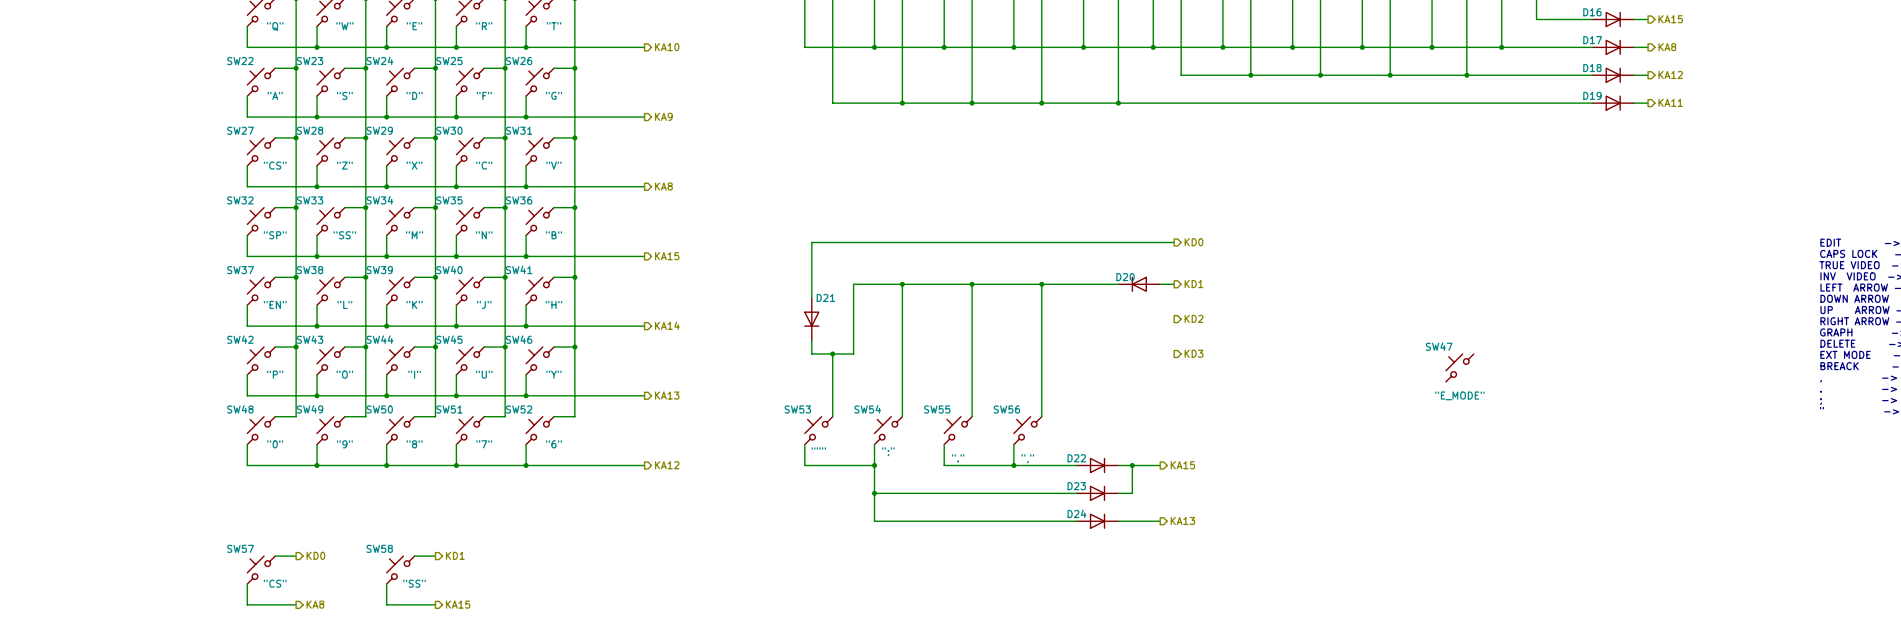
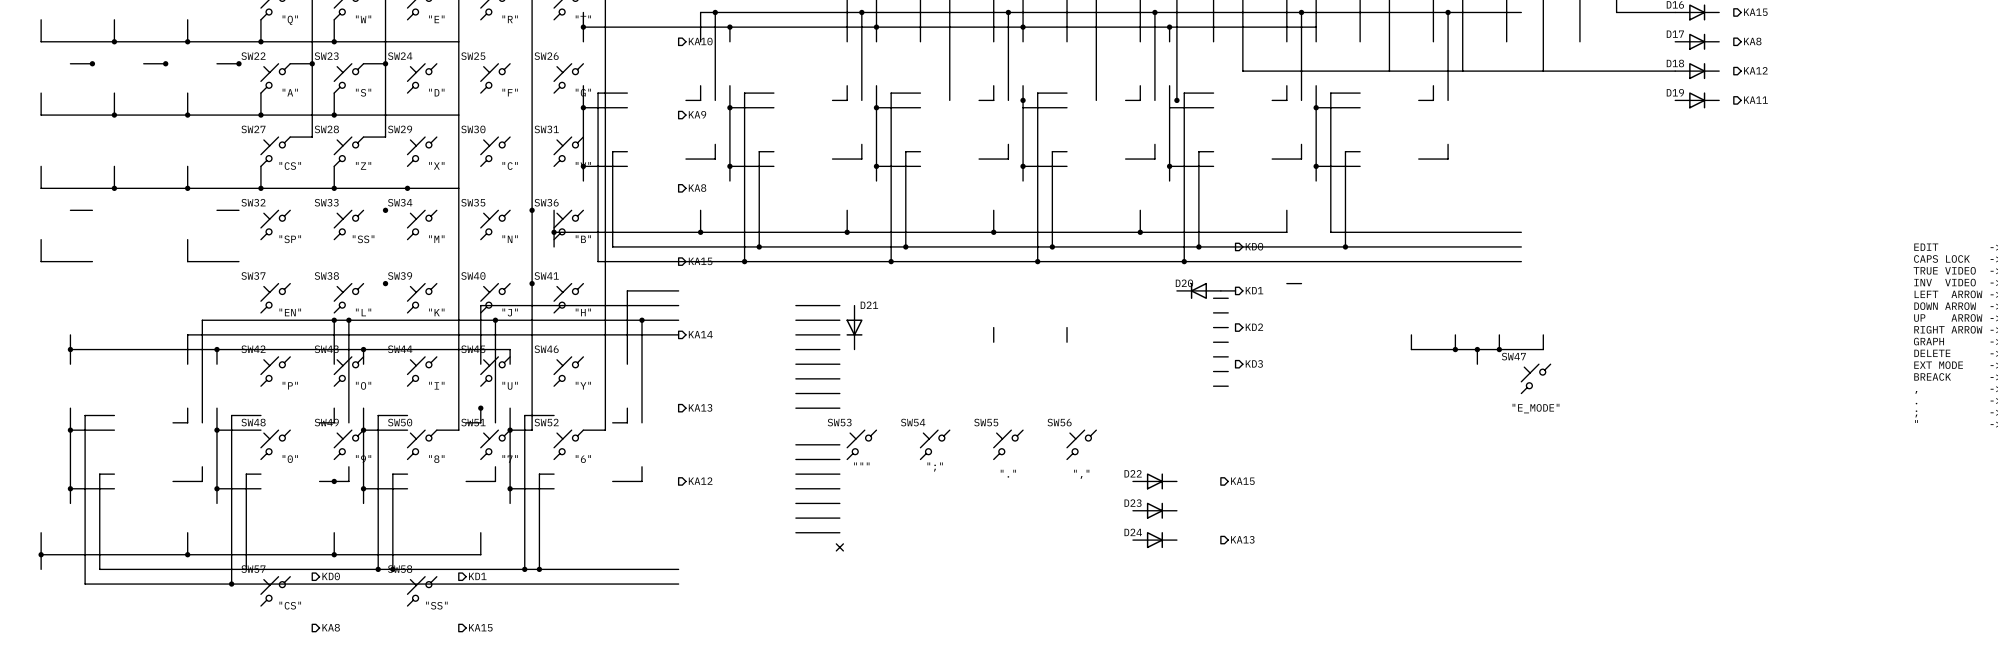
wire: none -> (583, 12) (583, 41)
wire: none -> (715, 12) (715, 100)
junction: none -> (715, 12)
wire: none -> (861, 12) (861, 100)
junction: none -> (861, 12)
wire: none -> (1008, 12) (1008, 100)
junction: none -> (1008, 12)
wire: none -> (1154, 12) (1154, 100)
junction: none -> (1154, 12)
wire: none -> (1301, 12) (1301, 100)
junction: none -> (1301, 12)
wire: none -> (1448, 12) (1448, 100)
junction: none -> (1448, 12)
wire: none -> (1521, 12) (700, 12) (700, 41)
wire: (1634, 19) (1648, 19) -> none
wire: none -> (41, 19) (41, 41) (260, 41)
wire: none -> (114, 19) (114, 41)
wire: none -> (187, 19) (187, 41)
wire: (386, 26) (386, 47) -> none
wire: (456, 26) (456, 47) -> none
wire: (526, 26) (526, 47) -> none
wire: none -> (583, 27) (1316, 27)
junction: none -> (583, 27)
wire: none -> (729, 27) (729, 41)
junction: none -> (729, 27)
junction: none -> (876, 27)
junction: none -> (1023, 27)
wire: none -> (1169, 27) (1169, 41)
junction: none -> (1169, 27)
junction: none -> (114, 41)
junction: none -> (187, 41)
junction: none -> (260, 41)
junction: (386, 47) -> none
wire: (435, 47) (644, 47) -> none
junction: (456, 47) -> none
junction: (526, 47) -> none
wire: (804, 47) (1592, 47) -> none
wire: (832, 47) (832, 89) -> none
junction: (874, 47) -> none
junction: (944, 47) -> none
wire: (972, 47) (972, 89) -> none
junction: (1013, 47) -> none
junction: (1083, 47) -> none
junction: (1153, 47) -> none
junction: (1222, 47) -> none
wire: (1250, 47) (1250, 75) -> none
junction: (1292, 47) -> none
junction: (1362, 47) -> none
junction: (1432, 47) -> none
junction: (1501, 47) -> none
wire: (1634, 47) (1648, 47) -> none
wire: none -> (70, 63) (92, 63)
junction: none -> (92, 63)
wire: none -> (143, 63) (165, 63)
junction: none -> (165, 63)
wire: none -> (216, 63) (238, 63)
junction: none -> (238, 63)
wire: (414, 68) (435, 68) -> none
junction: (435, 68) -> none
wire: (484, 68) (505, 68) -> none
junction: (505, 68) -> none
wire: (553, 68) (574, 68) -> none
junction: (574, 68) -> none
junction: (1250, 75) -> none
junction: (1320, 75) -> none
junction: (1390, 75) -> none
junction: (1466, 75) -> none
wire: (1634, 75) (1648, 75) -> none
wire: none -> (583, 85) (583, 181)
wire: none -> (700, 85) (700, 100) (685, 100)
wire: none -> (729, 85) (729, 181)
wire: none -> (847, 85) (847, 100) (832, 100)
wire: none -> (1169, 85) (1169, 181)
wire: none -> (1316, 85) (1316, 181)
wire: none -> (41, 93) (41, 115) (260, 115)
wire: none -> (114, 93) (114, 115)
wire: none -> (187, 93) (187, 115)
wire: (386, 96) (386, 117) -> none
wire: (456, 96) (456, 117) -> none
wire: (526, 96) (526, 117) -> none
wire: none -> (773, 93) (744, 93) (744, 261)
wire: none -> (920, 93) (891, 93) (891, 261)
wire: none -> (1067, 93) (1037, 93) (1037, 261)
wire: none -> (1213, 93) (1184, 93) (1184, 261)
wire: none -> (1360, 93) (1330, 93) (1330, 232) (1521, 232)
wire: (832, 103) (930, 103) -> (876, 100) (876, 181)
junction: (902, 103) -> none
wire: (944, 103) (1069, 103) -> (993, 100) (993, 85)
wire: none -> (1023, 100) (1023, 181)
junction: (1041, 103) -> none
wire: (1083, 103) (1209, 103) -> (1140, 100) (1140, 85)
wire: (1222, 103) (1348, 103) -> (1286, 100) (1286, 85)
wire: (1362, 103) (1592, 103) -> (1433, 100) (1433, 85)
wire: (1634, 103) (1648, 103) -> none
wire: none -> (583, 107) (627, 107)
junction: none -> (583, 107)
wire: none -> (729, 107) (773, 107)
junction: none -> (729, 107)
wire: none -> (876, 107) (920, 107)
junction: none -> (876, 107)
wire: none -> (1023, 107) (1067, 107)
wire: none -> (1169, 107) (1213, 107)
wire: none -> (1316, 107) (1360, 107)
junction: none -> (1316, 107)
junction: none -> (114, 115)
junction: none -> (187, 115)
junction: none -> (260, 115)
junction: (386, 117) -> none
wire: (435, 117) (644, 117) -> none
junction: (456, 117) -> none
junction: (526, 117) -> none
wire: (296, 137) (296, 416) (275, 416) -> none
junction: (296, 137) -> none
wire: (365, 137) (365, 416) -> (407, 430) (385, 430)
junction: (365, 137) -> none
wire: (414, 137) (435, 137) -> none
junction: (435, 137) -> none
wire: (484, 137) (505, 137) -> none
junction: (505, 137) -> none
wire: (553, 137) (574, 137) -> none
junction: (574, 137) -> none
wire: none -> (715, 144) (715, 159) (685, 159)
wire: none -> (861, 144) (861, 159) (832, 159)
wire: none -> (1008, 144) (1008, 159) (979, 159)
wire: none -> (1154, 144) (1154, 159) (1125, 159)
wire: none -> (1301, 144) (1301, 159) (1272, 159)
wire: none -> (1448, 144) (1448, 159) (1418, 159)
wire: none -> (773, 151) (759, 151) (759, 246)
wire: none -> (920, 151) (905, 151) (905, 246)
wire: none -> (1067, 151) (1052, 151) (1052, 246)
wire: none -> (1213, 151) (1198, 151) (1198, 246)
wire: none -> (1360, 151) (1345, 151) (1345, 246)
wire: none -> (41, 166) (41, 188) (260, 188)
wire: none -> (114, 166) (114, 188)
wire: none -> (187, 166) (187, 188)
wire: (386, 165) (386, 186) -> none
wire: (456, 165) (456, 186) -> none
wire: (526, 165) (526, 186) -> none
wire: none -> (583, 166) (627, 166)
junction: none -> (583, 166)
wire: none -> (729, 166) (773, 166)
junction: none -> (729, 166)
wire: none -> (876, 166) (920, 166)
junction: none -> (876, 166)
wire: none -> (1023, 166) (1067, 166)
junction: none -> (1023, 166)
wire: none -> (1169, 166) (1213, 166)
junction: none -> (1169, 166)
wire: none -> (1316, 166) (1360, 166)
junction: none -> (1316, 166)
junction: none -> (114, 188)
junction: none -> (187, 188)
junction: none -> (260, 188)
wire: (435, 186) (644, 186) -> none
junction: (456, 186) -> none
junction: (526, 186) -> none
wire: none -> (70, 210) (92, 210)
wire: (275, 207) (296, 207) -> none
junction: (296, 207) -> none
wire: (344, 207) (365, 207) -> none
wire: (414, 207) (435, 207) -> none
junction: (435, 207) -> none
wire: (484, 207) (505, 207) -> none
wire: none -> (554, 210) (554, 239)
wire: (553, 207) (574, 207) -> none
junction: (574, 207) -> none
wire: none -> (700, 210) (700, 232)
wire: none -> (847, 210) (847, 232)
wire: none -> (993, 210) (993, 232)
wire: none -> (1140, 210) (1140, 232)
wire: none -> (1286, 210) (1286, 232) (554, 232)
junction: none -> (554, 232)
junction: none -> (700, 232)
junction: none -> (847, 232)
junction: none -> (993, 232)
junction: none -> (1140, 232)
wire: none -> (41, 239) (41, 261) (92, 261)
wire: none -> (187, 239) (187, 261) (238, 261)
wire: (247, 235) (247, 256) (567, 256) -> (627, 93) (598, 93) (598, 261)
wire: (317, 235) (317, 256) -> none
wire: (386, 235) (386, 256) -> none
wire: (456, 235) (456, 256) -> none
wire: (526, 242) (526, 256) -> none
junction: none -> (759, 246)
wire: (811, 242) (811, 298) -> (854, 246) (612, 246) (612, 151) (627, 151)
junction: none -> (905, 246)
junction: none -> (1052, 246)
junction: none -> (1198, 246)
wire: none -> (1235, 246) (1521, 246)
junction: none -> (1345, 246)
junction: (317, 256) -> none
junction: (386, 256) -> none
junction: (456, 256) -> none
junction: (526, 256) -> none
wire: none -> (678, 261) (1521, 261)
junction: none -> (744, 261)
junction: none -> (891, 261)
junction: none -> (1037, 261)
junction: none -> (1184, 261)
wire: (275, 277) (296, 277) -> (216, 210) (238, 210)
junction: (296, 277) -> none
wire: (344, 277) (365, 277) -> none
wire: (414, 277) (435, 277) -> none
junction: (435, 277) -> none
wire: (484, 277) (505, 277) -> none
wire: (553, 277) (574, 277) -> none
junction: (574, 277) -> none
wire: none -> (1286, 283) (1301, 283)
wire: none -> (678, 290) (627, 290) (627, 364)
wire: (902, 284) (902, 416) -> none
junction: (902, 284) -> none
wire: (972, 284) (972, 416) -> none
junction: (972, 284) -> none
wire: (1041, 284) (1041, 416) -> none
junction: (1041, 284) -> none
wire: (1118, 284) (853, 284) (853, 353) (811, 353) (811, 340) -> none
wire: none -> (1213, 298) (1228, 298)
wire: none -> (678, 305) (480, 305) (480, 312)
wire: none -> (795, 305) (839, 305)
wire: (247, 305) (247, 326) -> (187, 364) (187, 334) (260, 334)
wire: (317, 305) (317, 312) -> none
wire: (386, 305) (386, 326) -> none
wire: (526, 305) (526, 326) -> none
wire: none -> (1213, 312) (1228, 312)
junction: none -> (334, 320)
wire: none -> (348, 320) (348, 422)
junction: none -> (348, 320)
wire: none -> (495, 320) (495, 422)
wire: none -> (642, 320) (642, 422)
junction: none -> (642, 320)
wire: none -> (678, 320) (202, 320) (202, 422)
wire: none -> (795, 320) (839, 320)
wire: none -> (993, 327) (993, 342)
wire: none -> (1067, 327) (1067, 342)
wire: none -> (1213, 327) (1228, 327)
wire: none -> (70, 334) (70, 364)
wire: none -> (334, 334) (334, 364)
junction: (317, 326) -> none
junction: (386, 326) -> none
wire: none -> (480, 334) (480, 364)
junction position: (456, 326) -> (495, 320)
junction: (526, 326) -> none
wire: none -> (795, 334) (839, 334)
wire: none -> (1411, 334) (1411, 349) (1543, 349) (1543, 334)
wire: none -> (1455, 334) (1455, 349)
wire: none -> (1499, 334) (1499, 349)
wire: none -> (1213, 342) (1228, 342)
wire: none -> (70, 349) (510, 349) (510, 364)
junction: none -> (70, 349)
wire: none -> (216, 349) (216, 364)
junction: none -> (216, 349)
wire: none -> (363, 349) (363, 364)
junction: none -> (363, 349)
wire: none -> (795, 349) (839, 349)
junction: none -> (1455, 349)
wire: none -> (1477, 349) (1477, 364)
junction: none -> (1477, 349)
junction: none -> (1499, 349)
wire: (275, 347) (296, 347) -> none
junction: (296, 347) -> none
wire: (344, 347) (365, 347) -> none
junction: (365, 347) -> none
wire: (414, 347) (435, 347) -> none
junction: (435, 347) -> none
wire: (484, 347) (505, 347) -> none
junction: (505, 347) -> none
wire: (553, 347) (574, 347) -> none
junction: (574, 347) -> none
wire: none -> (1213, 356) (1228, 356)
wire: none -> (795, 364) (839, 364)
wire: (832, 353) (832, 416) -> none
junction: (832, 353) -> none
wire: none -> (1213, 371) (1228, 371)
wire: none -> (795, 378) (839, 378)
wire: (247, 374) (247, 395) (644, 395) -> none
wire: (317, 374) (317, 395) -> (319, 422) (334, 422) (334, 408)
wire: (386, 374) (386, 395) -> none
wire: (456, 374) (456, 395) -> (466, 422) (480, 422) (480, 408)
wire: (526, 374) (526, 395) -> none
wire: none -> (1213, 386) (1228, 386)
wire: none -> (795, 393) (839, 393)
wire: none -> (70, 408) (70, 503)
wire: none -> (187, 408) (187, 422) (173, 422)
wire: none -> (216, 408) (216, 503)
junction: (317, 395) -> none
wire: none -> (363, 408) (363, 503)
junction: (386, 395) -> none
wire: none -> (510, 408) (510, 503)
junction: (526, 395) -> none
wire: none -> (627, 408) (627, 422) (612, 422)
wire: none -> (795, 408) (839, 408)
wire: none -> (114, 415) (85, 415) (85, 584) (678, 584)
wire: none -> (260, 415) (231, 415) (231, 584)
wire: none -> (407, 415) (378, 415) (378, 569)
wire: none -> (554, 415) (524, 415) (524, 569)
wire: none -> (70, 430) (114, 430)
junction: none -> (70, 430)
wire: none -> (216, 430) (260, 430)
junction: none -> (216, 430)
junction: none -> (363, 430)
junction: none -> (510, 430)
wire: none -> (795, 444) (839, 444)
wire: (247, 444) (247, 465) (303, 465) -> none
wire: (317, 444) (317, 465) -> (334, 532) (334, 554)
wire: (386, 444) (386, 465) -> none
wire: (456, 444) (456, 465) -> none
wire: (526, 444) (526, 465) -> none
wire: none -> (795, 459) (839, 459)
wire: (804, 444) (804, 465) (874, 465) -> none
wire: (874, 444) (874, 521) (1076, 521) -> none
wire: (944, 444) (944, 465) (1076, 465) -> none
wire: (1013, 444) (1013, 465) -> none
wire: none -> (202, 466) (202, 481) (173, 481)
wire: none -> (114, 474) (99, 474) (99, 569) (678, 569)
wire: none -> (260, 474) (246, 474) (246, 569)
wire: none -> (407, 474) (392, 474) (392, 569)
wire: none -> (554, 474) (539, 474) (539, 569)
wire: none -> (795, 474) (839, 474)
wire: (330, 465) (442, 465) -> (348, 481) (348, 466)
junction: (386, 465) -> none
junction: (456, 465) -> none
wire: (470, 465) (581, 465) -> (495, 481) (495, 466)
junction: (526, 465) -> none
wire: (609, 465) (644, 465) -> (642, 481) (642, 466)
junction: (874, 465) -> none
junction: (1013, 465) -> none
wire: (1118, 465) (1160, 465) -> none
wire: (1132, 465) (1132, 493) (1118, 493) -> none
junction: (1132, 465) -> none
wire: none -> (70, 488) (114, 488)
junction: none -> (70, 488)
wire: none -> (216, 488) (260, 488)
junction: none -> (216, 488)
wire: none -> (363, 488) (407, 488)
junction: none -> (363, 488)
wire: none -> (510, 488) (554, 488)
junction: none -> (510, 488)
wire: none -> (795, 488) (839, 488)
wire: none -> (795, 503) (839, 503)
wire: (874, 493) (1076, 493) -> none
junction: (874, 493) -> none
wire: none -> (795, 518) (839, 518)
wire: none -> (41, 532) (41, 569)
wire: none -> (187, 532) (187, 554)
wire: none -> (480, 532) (480, 554) (41, 554)
wire: none -> (795, 532) (839, 532)
wire: (1118, 521) (1160, 521) -> none
no-connect mark: none -> (839, 547)
junction: none -> (41, 554)
junction: none -> (187, 554)
junction: none -> (334, 554)
junction: none -> (378, 569)
junction: none -> (392, 569)
junction: none -> (524, 569)
junction: none -> (539, 569)
wire: (275, 556) (296, 556) -> none
wire: (414, 556) (435, 556) -> none
junction: none -> (231, 584)
wire: (247, 583) (247, 604) (296, 604) -> none
wire: (386, 583) (386, 604) (435, 604) -> none

